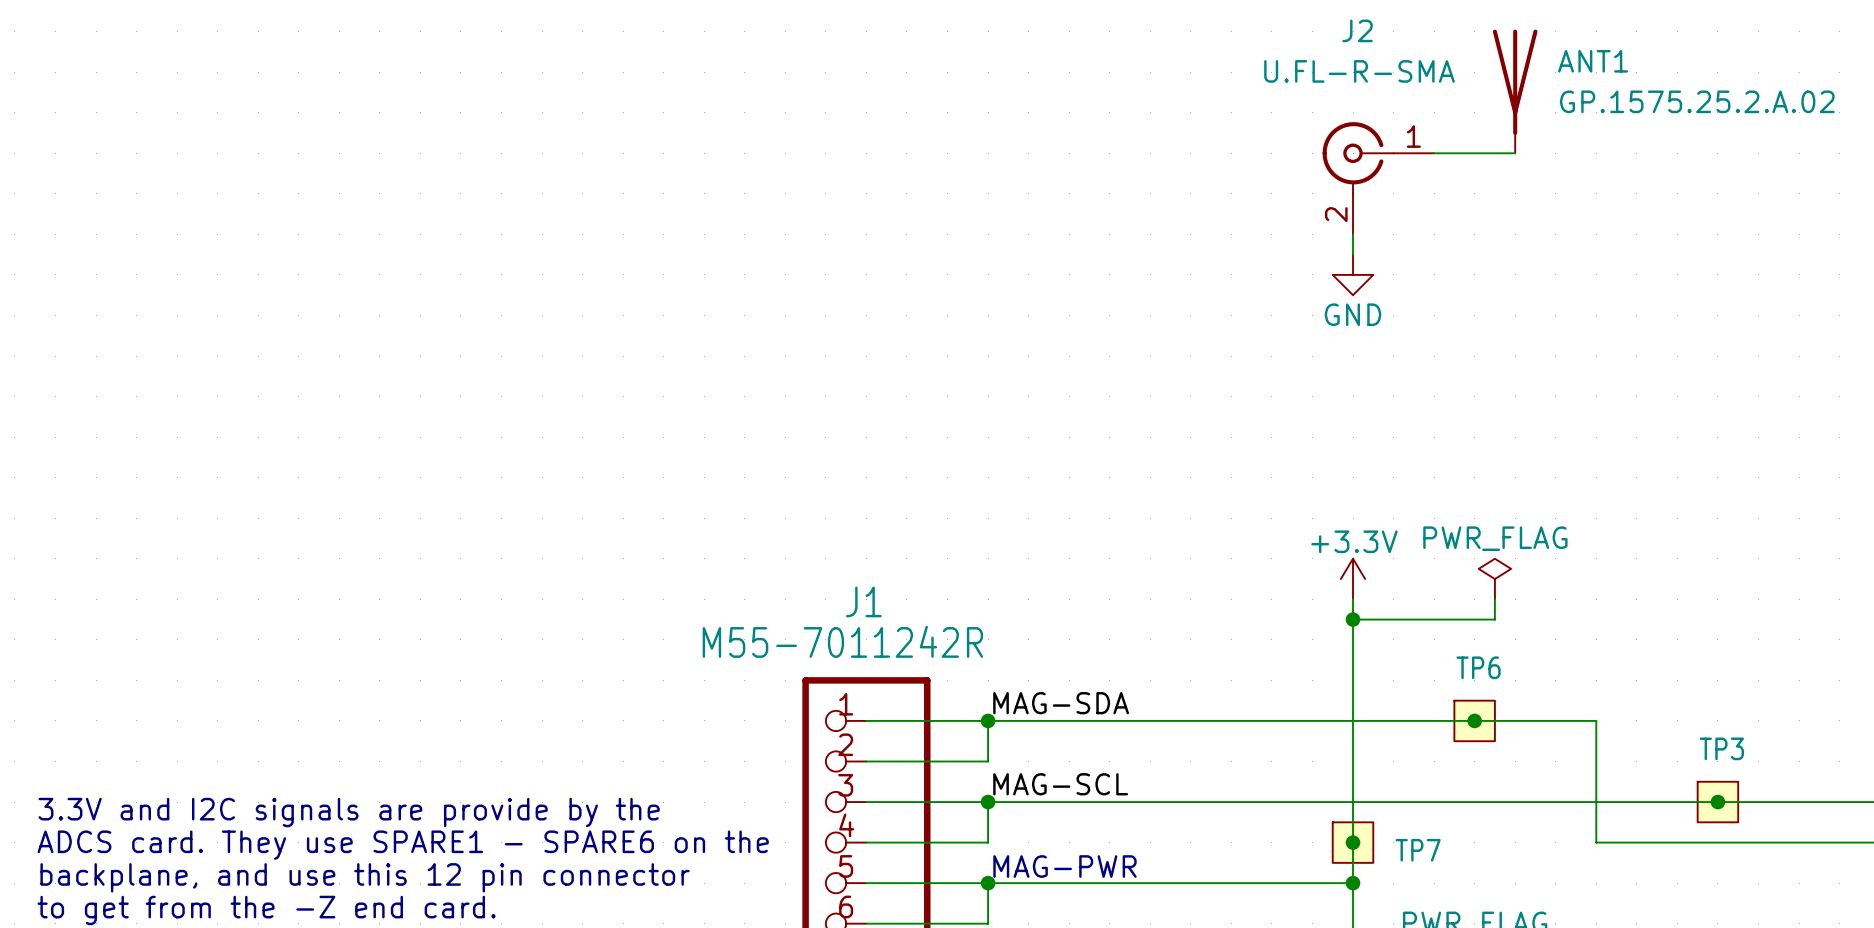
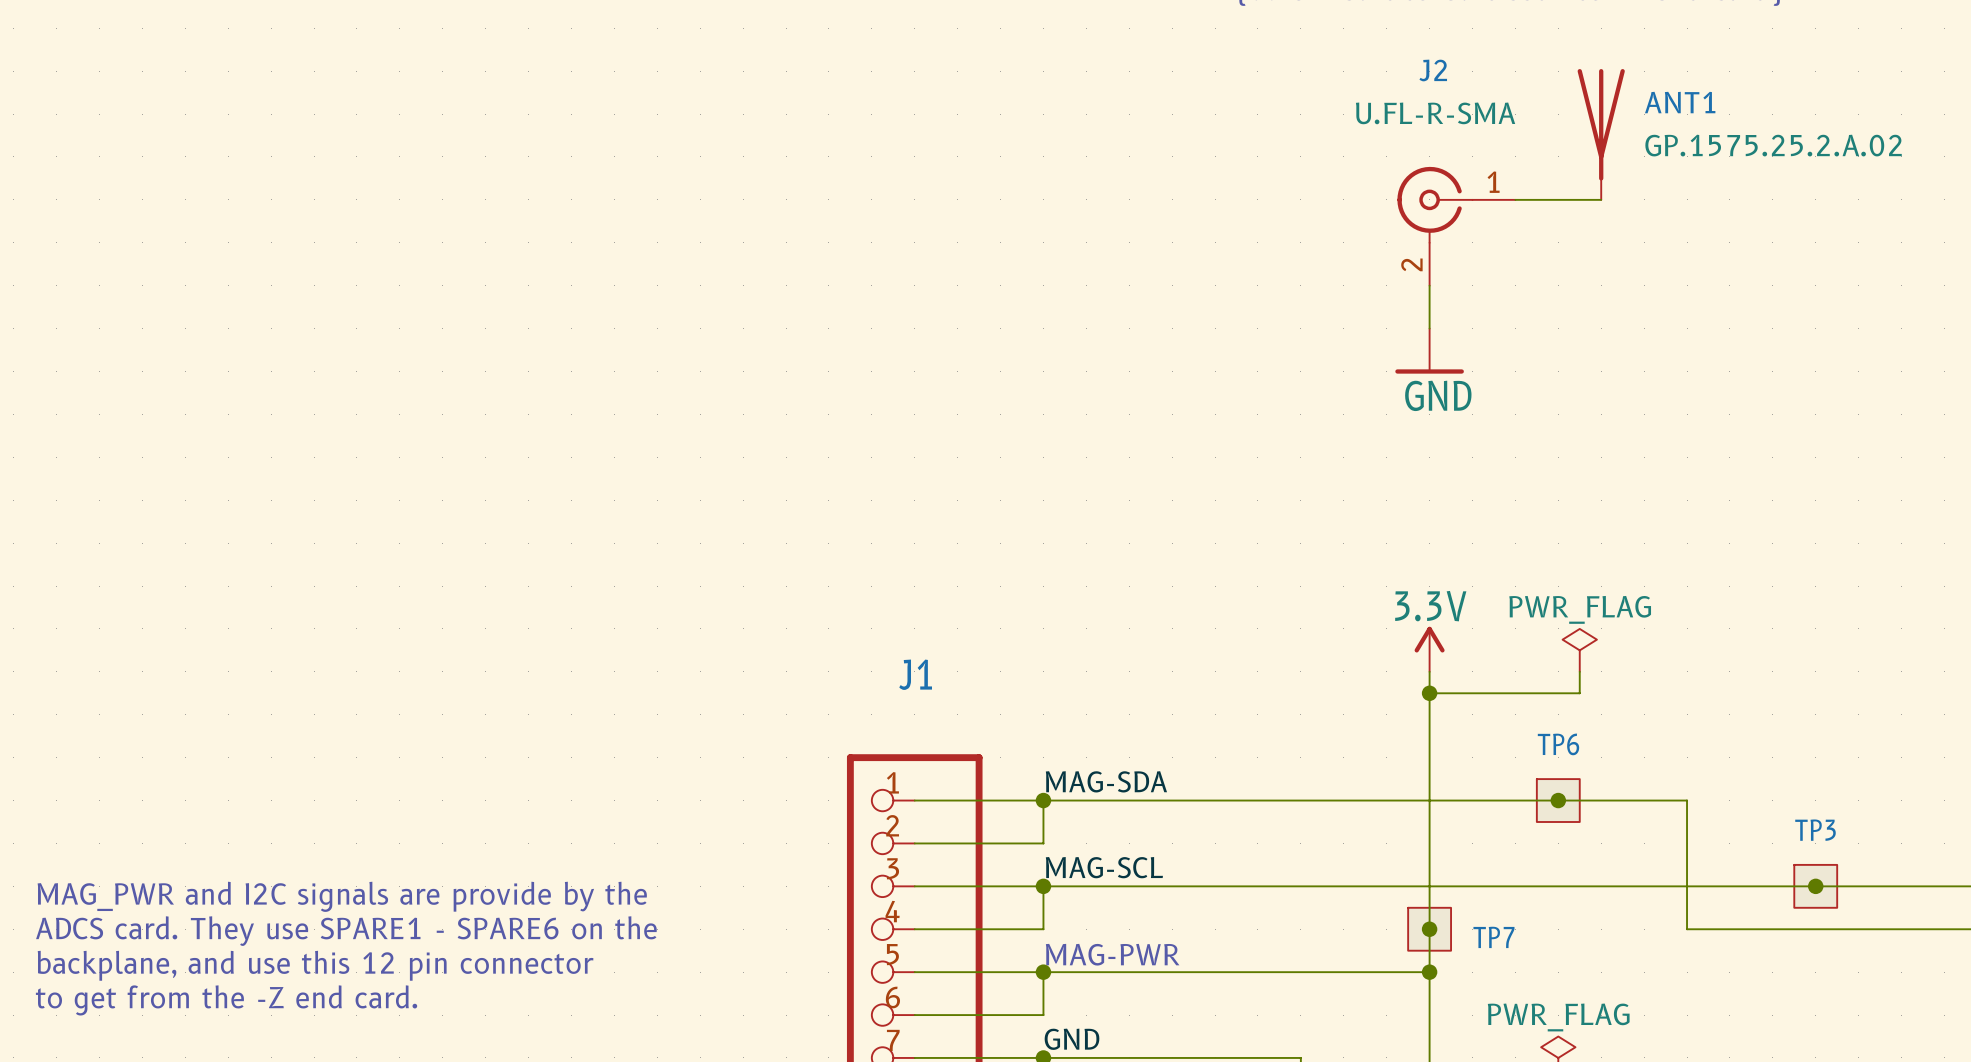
power symbol: GND (1353, 274) -> none
power symbol: none -> GND (1429, 351)
power symbol: +3.3V (1353, 579) -> 3.3V (1429, 649)
J1 value: M55-7011242R (842, 641) -> none
text: 3.3V and I2C signals are provide by the (349, 812) -> MAG_PWR and I2C signals are provide by the (342, 896)

